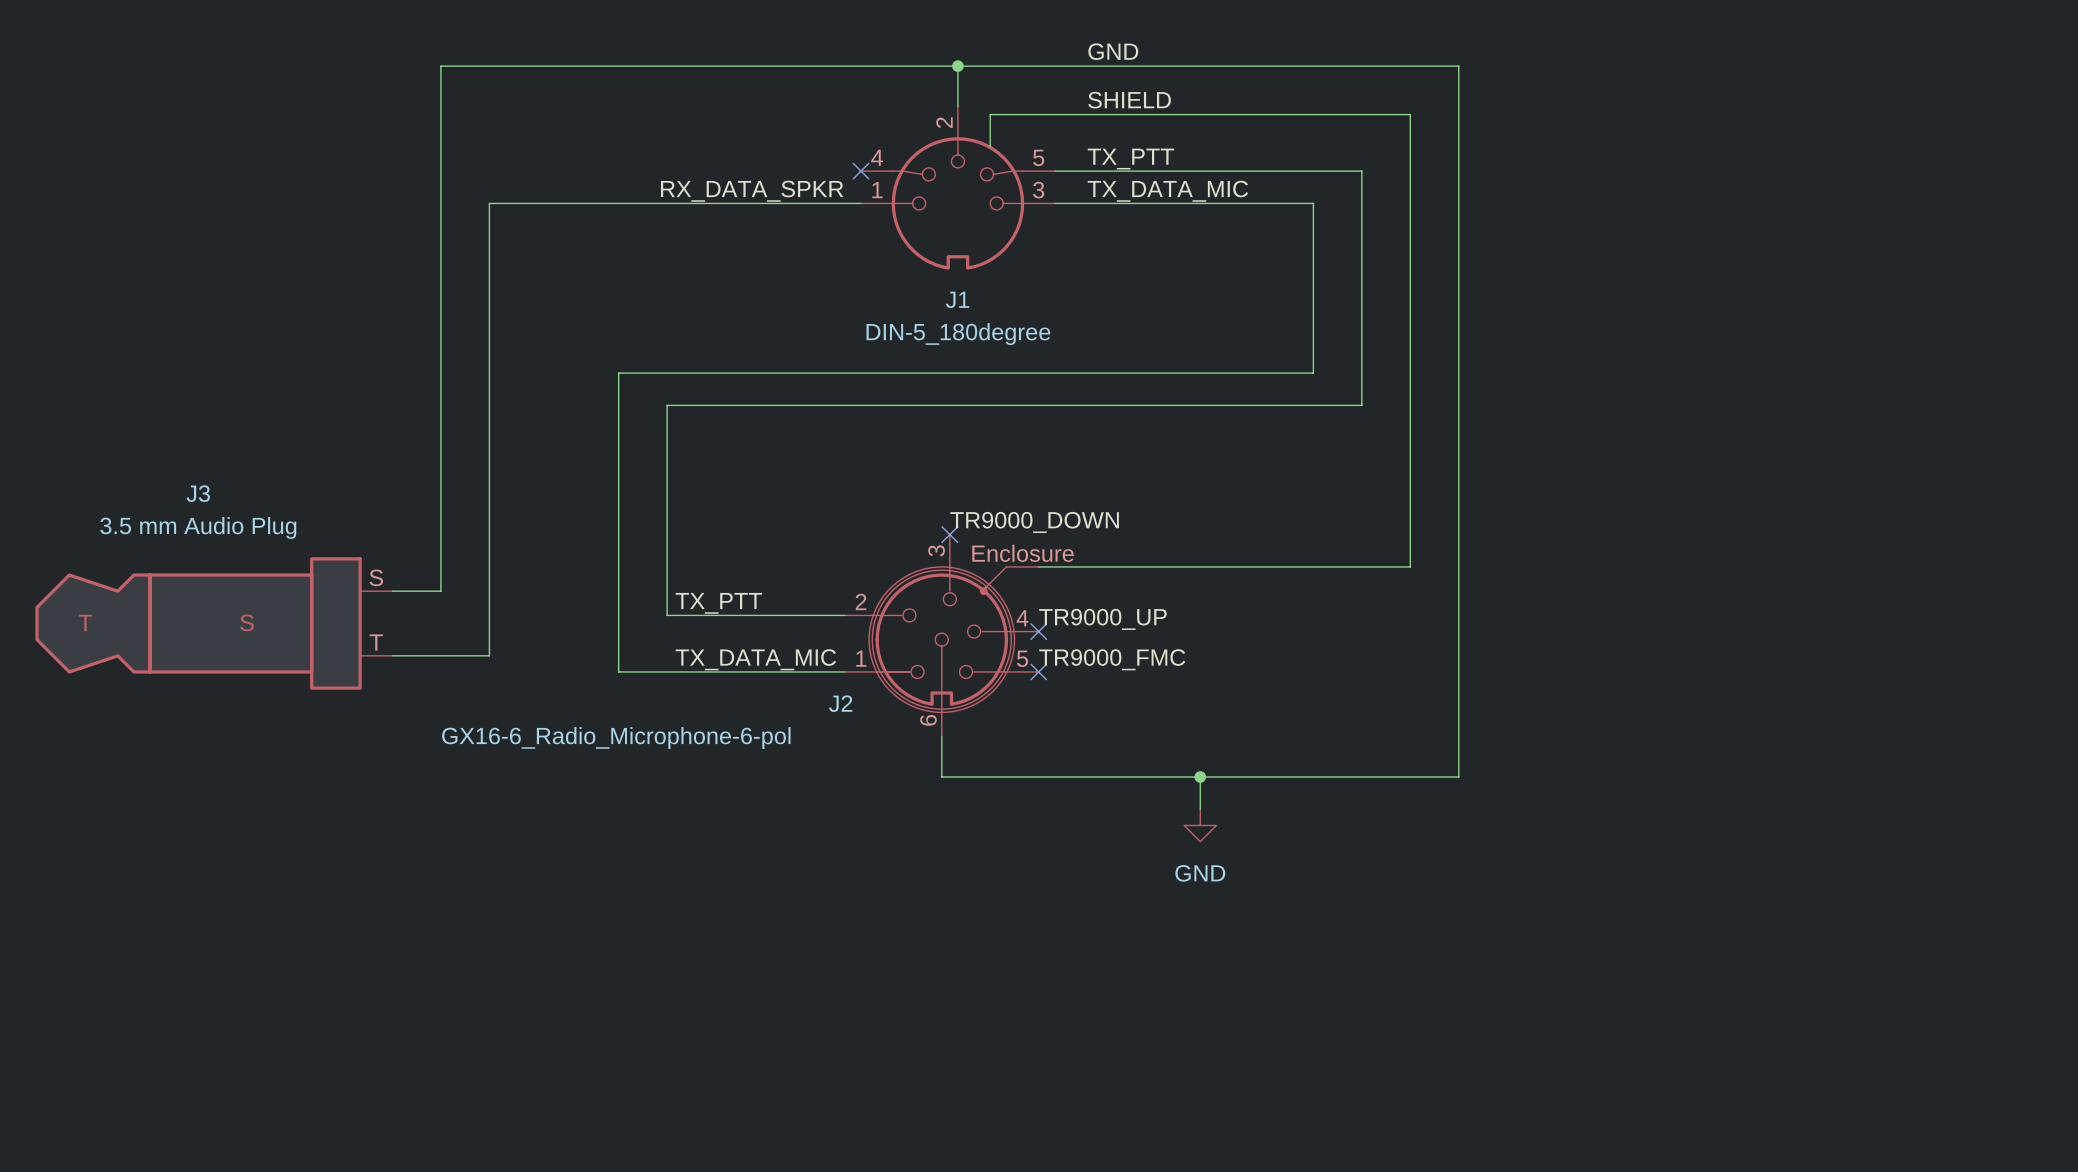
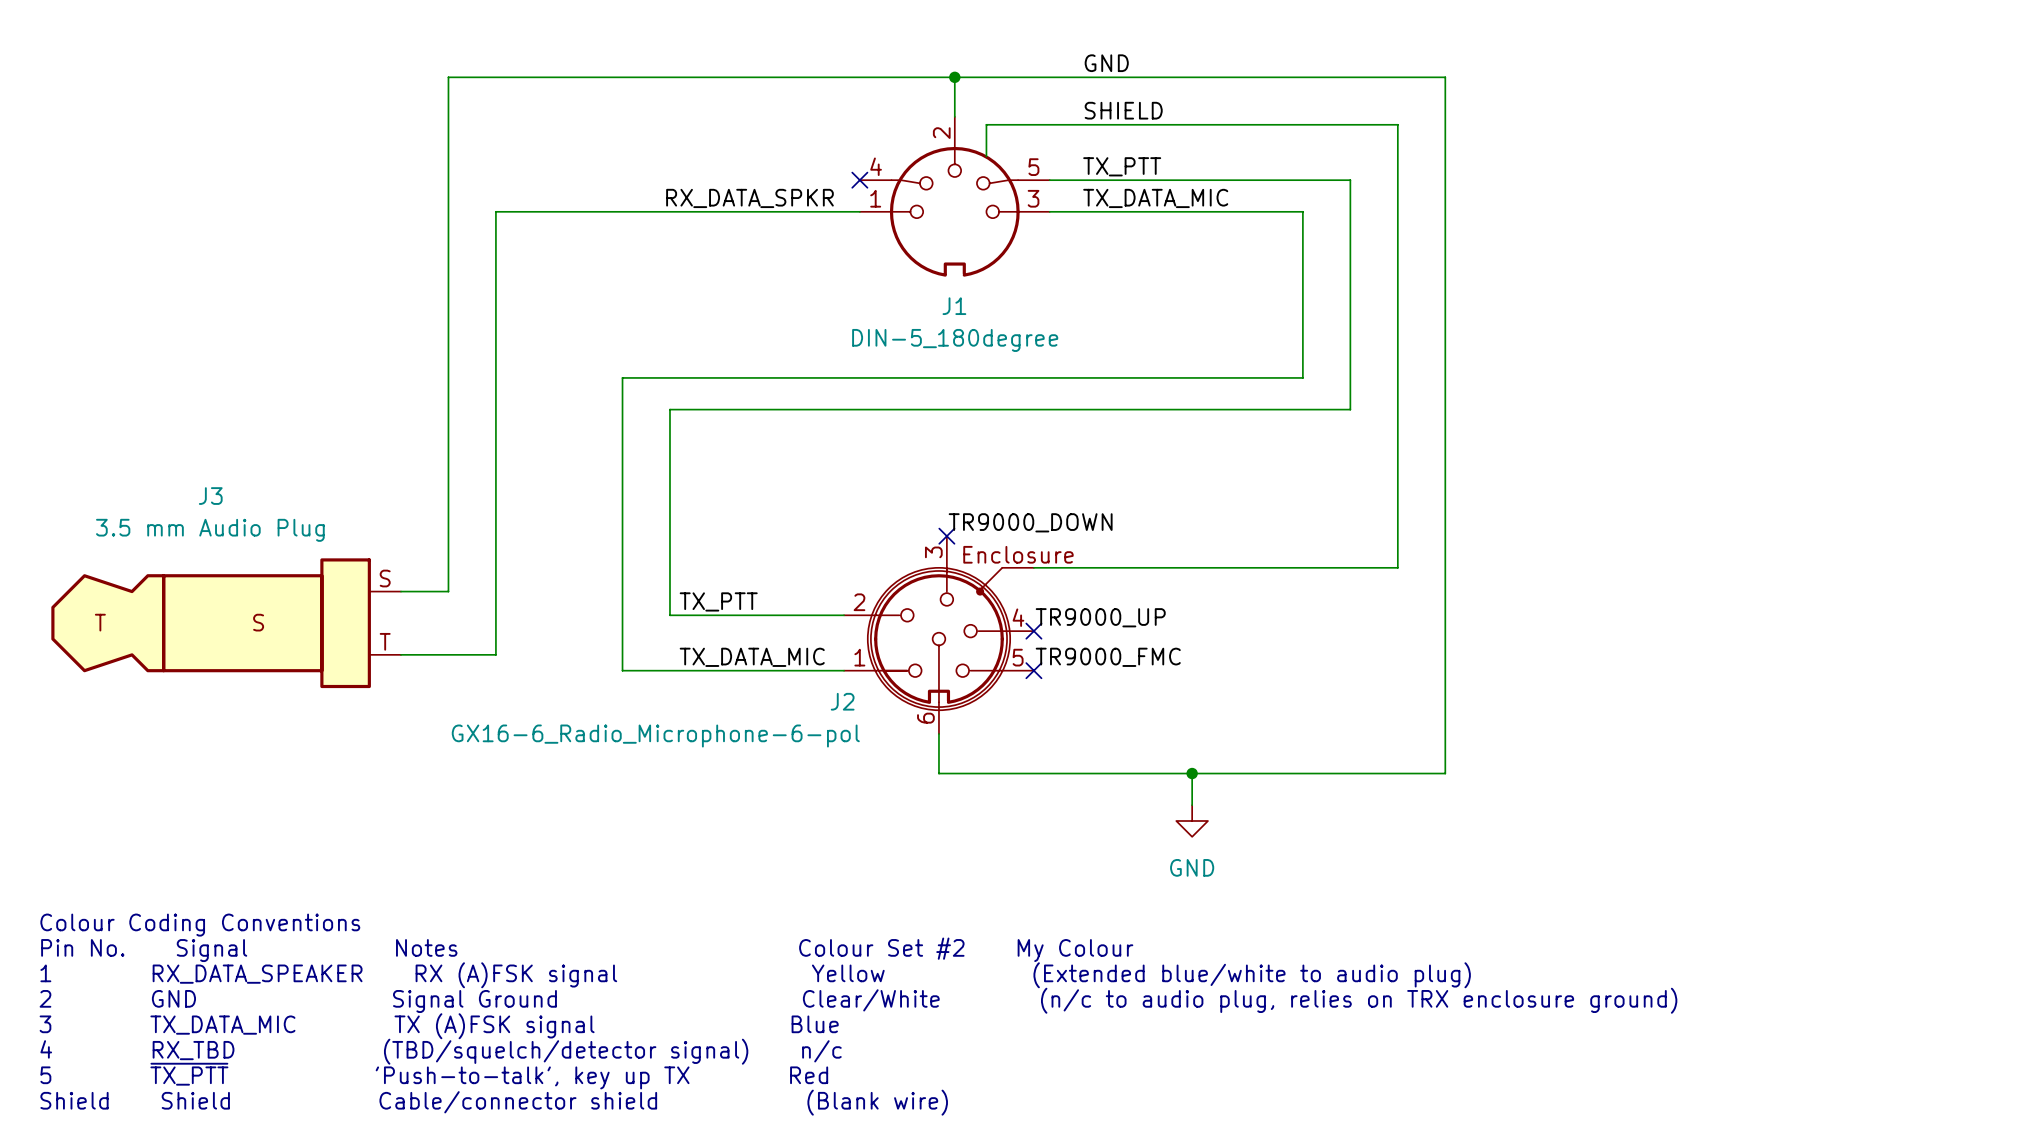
text: none -> Colour Coding Conventions (200, 925)
text: none -> Pin No. Signal Notes Colour Set #2 My Colour (587, 949)
text: none -> 1 RX_DATA_SPEAKER RX (A)FSK signal Yellow (Extended blue/white to audio plug) (755, 975)
text: none -> 2 GND Signal Ground Clear/White (n/c to audio plug, relies on TRX enclosure ground) (858, 1000)
text: none -> 3 TX_DATA_MIC TX (A)FSK signal Blue (439, 1026)
text: none -> 4 RX_TBD (TBD/squelch/detector signal) n/c (441, 1051)
text: none -> 5 ~{TX_PTT} 'Push-to-talk', key up TX Red (434, 1076)
text: none -> Shield Shield Cable/connector shield (Blank wire) (494, 1102)

